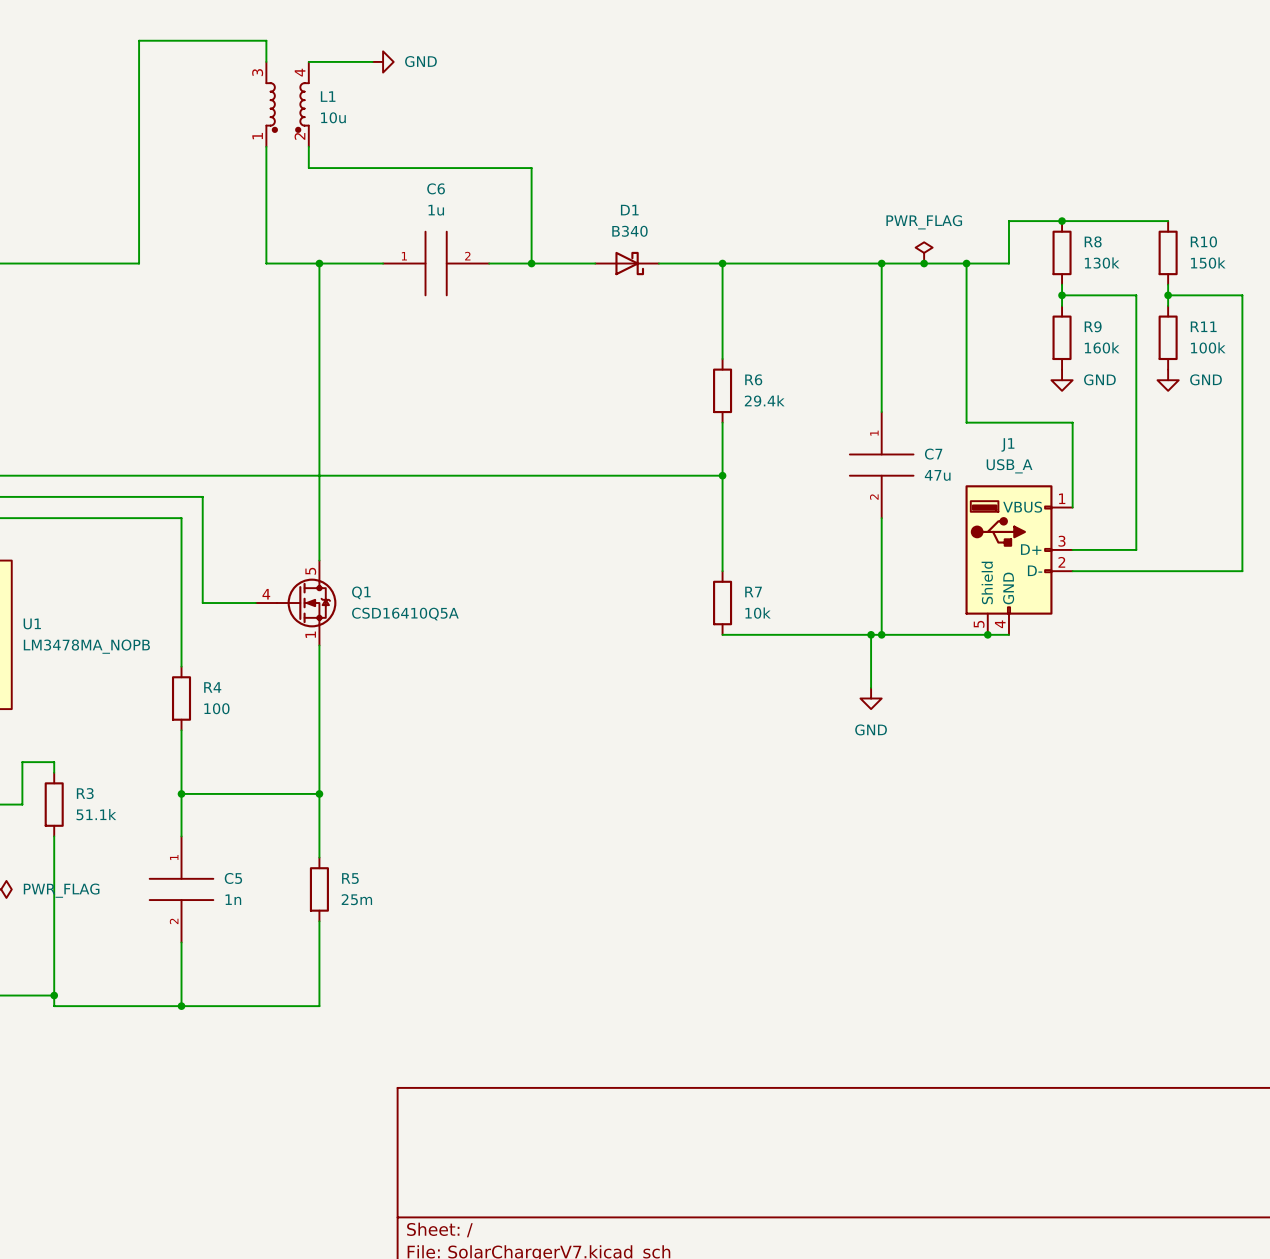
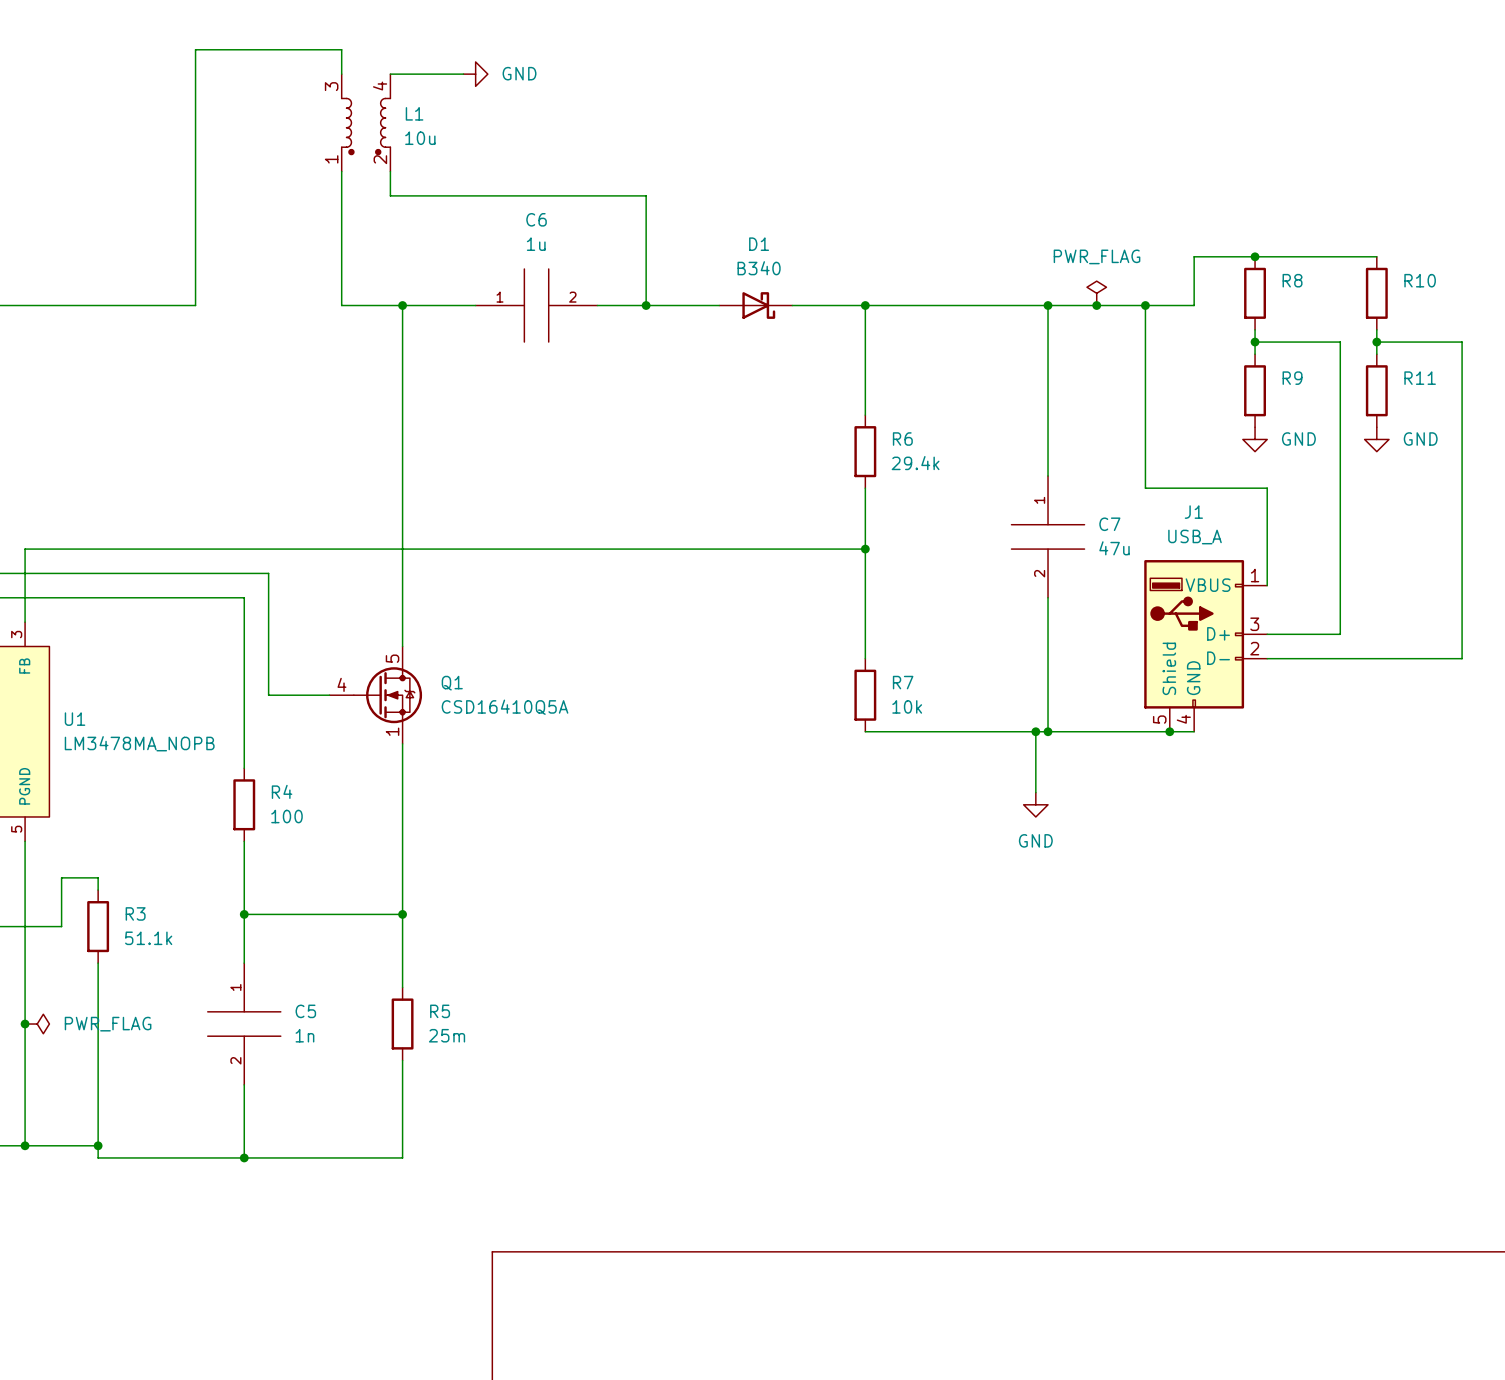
R8 value: 130k (1102, 263) -> none
R10 value: 150k (1208, 263) -> none
R9 value: 160k (1102, 347) -> none
R11 value: 100k (1208, 347) -> none

